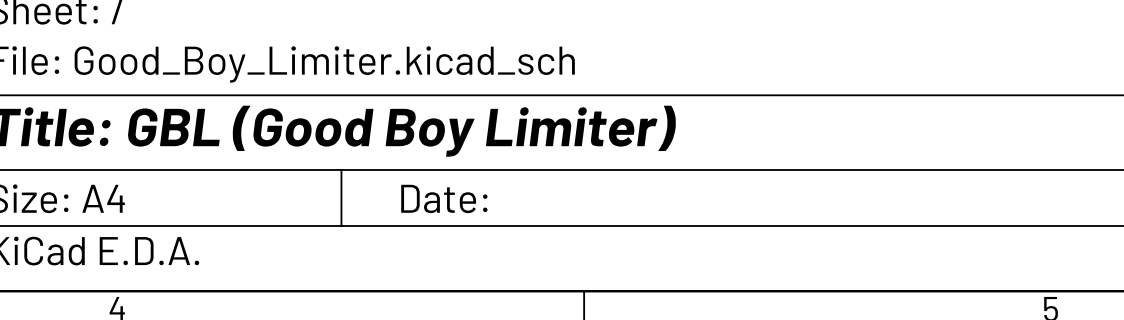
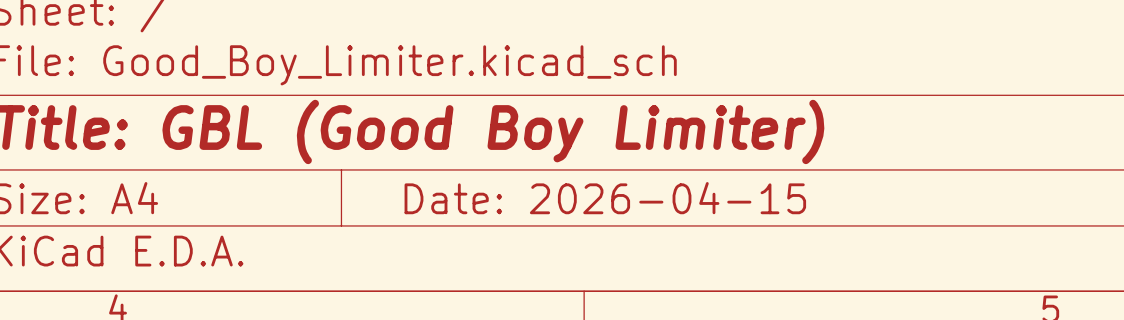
title block: Date: (444, 198) -> Date: 2026-04-15 (605, 198)

